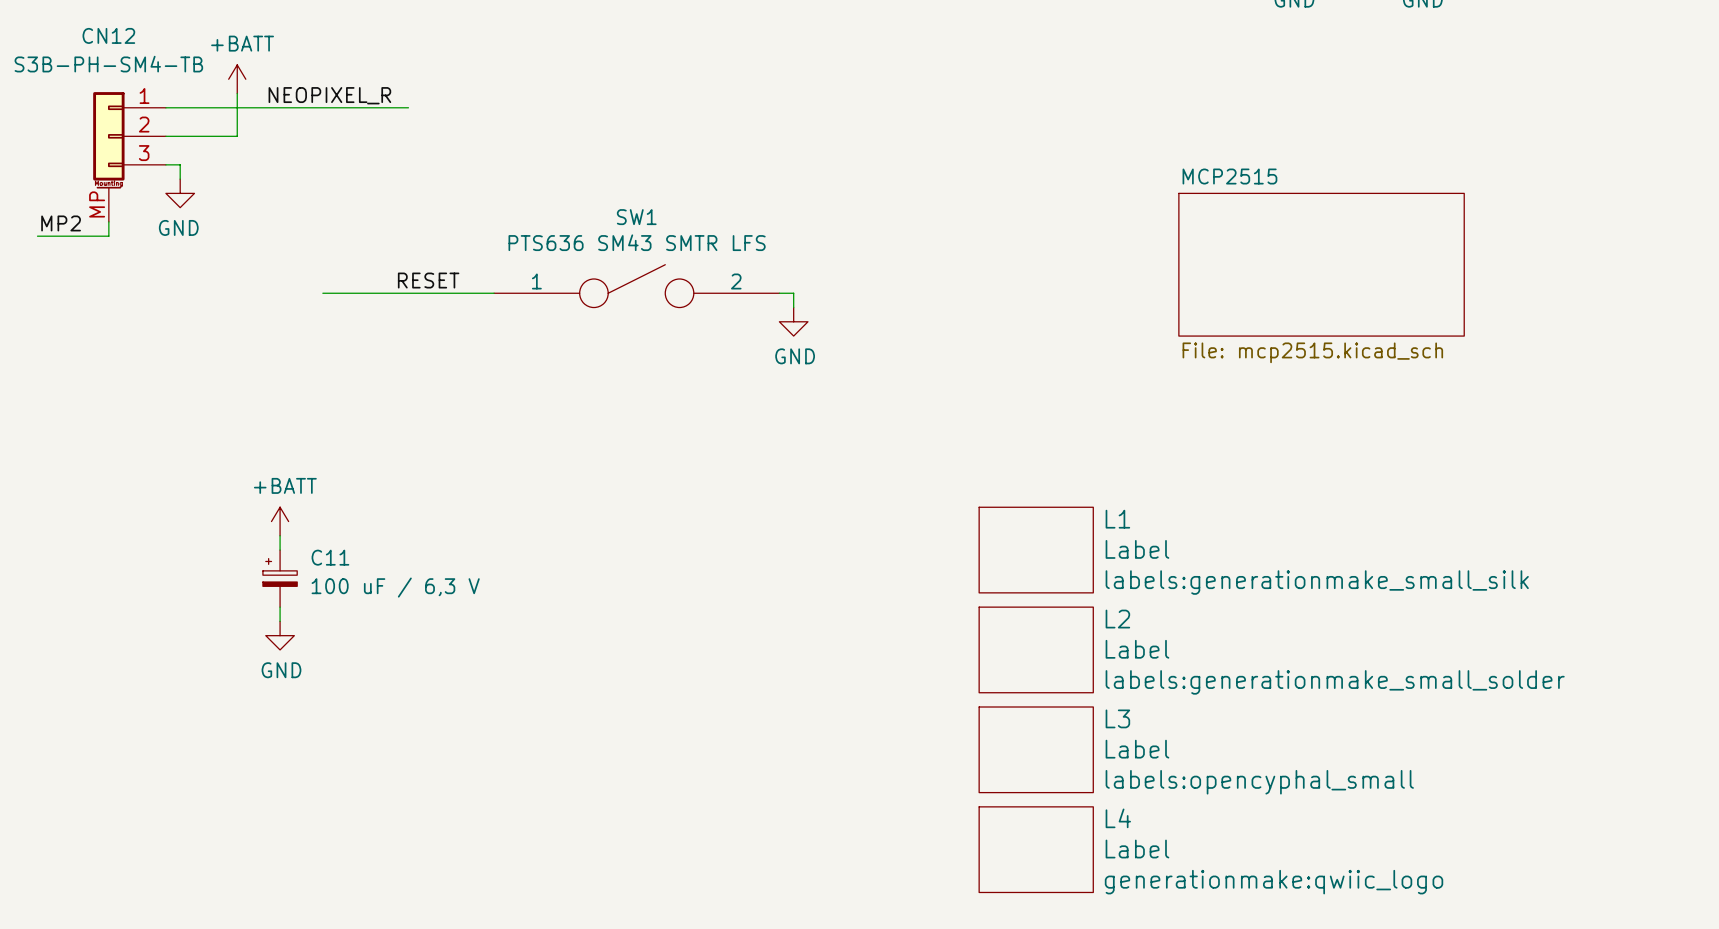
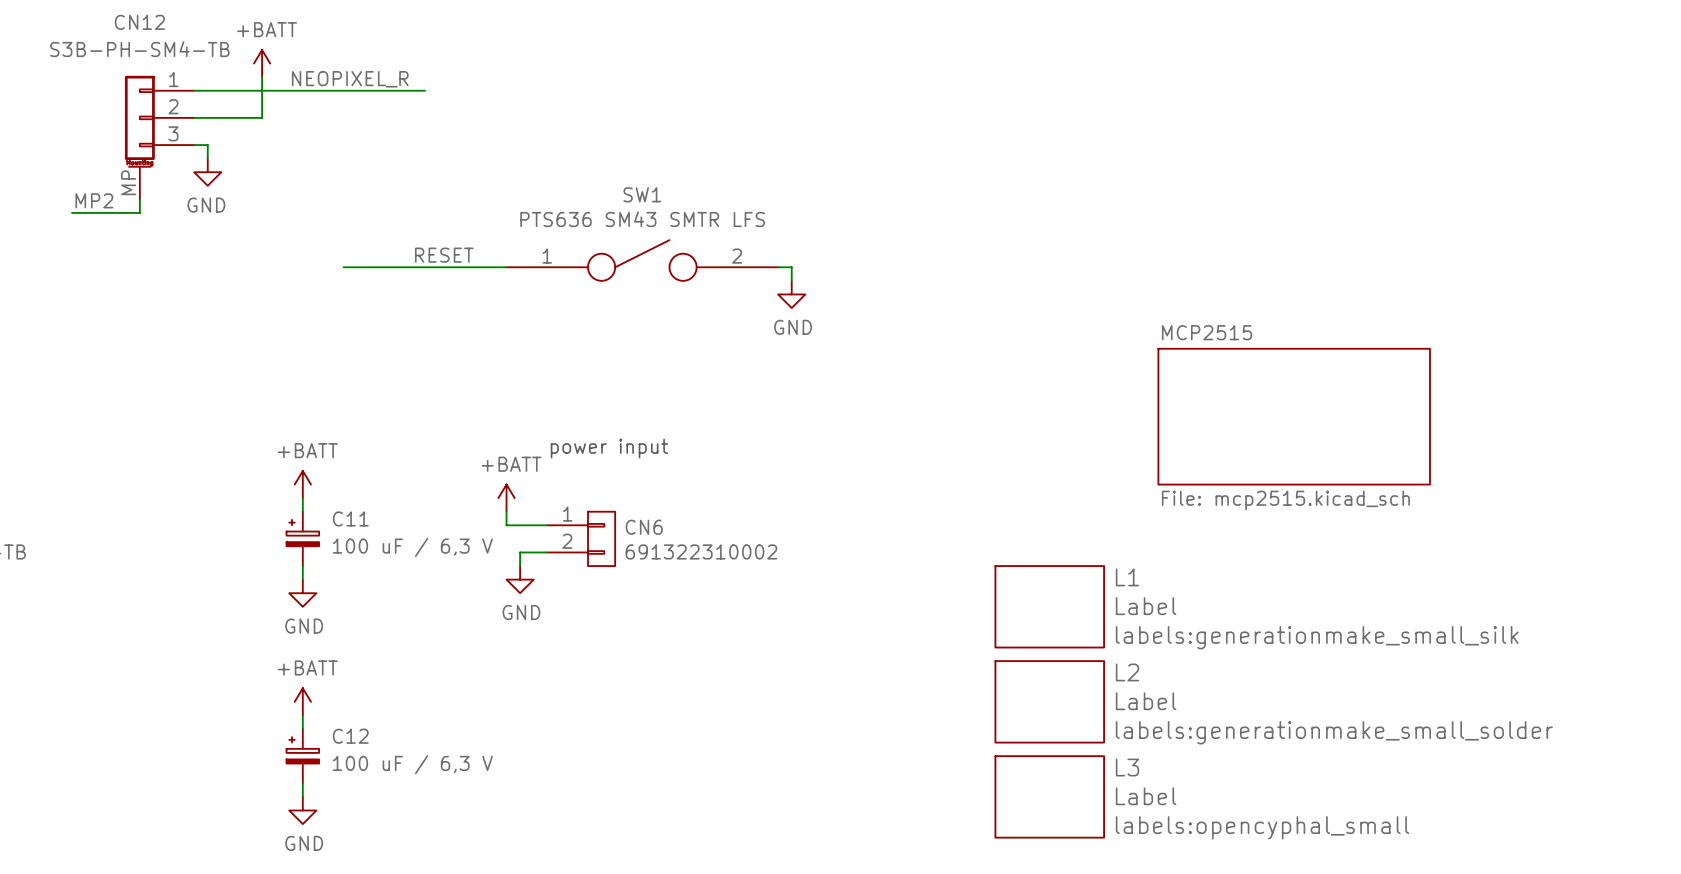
sheet MCP2515 position: (1321, 264) -> (1294, 416)
text: none -> power input (609, 448)
power symbol: none -> +BATT (506, 498)
wire: none -> (506, 511) (506, 525) (547, 525)
L1 position: (1036, 550) -> (1049, 606)
CN6: none -> 691322310002 (581, 538)
wire: none -> (547, 552) (520, 552) (520, 566)
power symbol: none -> GND (520, 579)
L2 position: (1036, 649) -> (1049, 701)
power symbol: none -> +BATT (302, 701)
L3 position: (1036, 749) -> (1049, 796)
wire: none -> (302, 715) (302, 729)
C12: none -> 100 uF / 6,3 V (302, 756)
wire: none -> (302, 783) (302, 796)
L4: Label (1036, 849) -> none
power symbol: none -> GND (302, 810)

